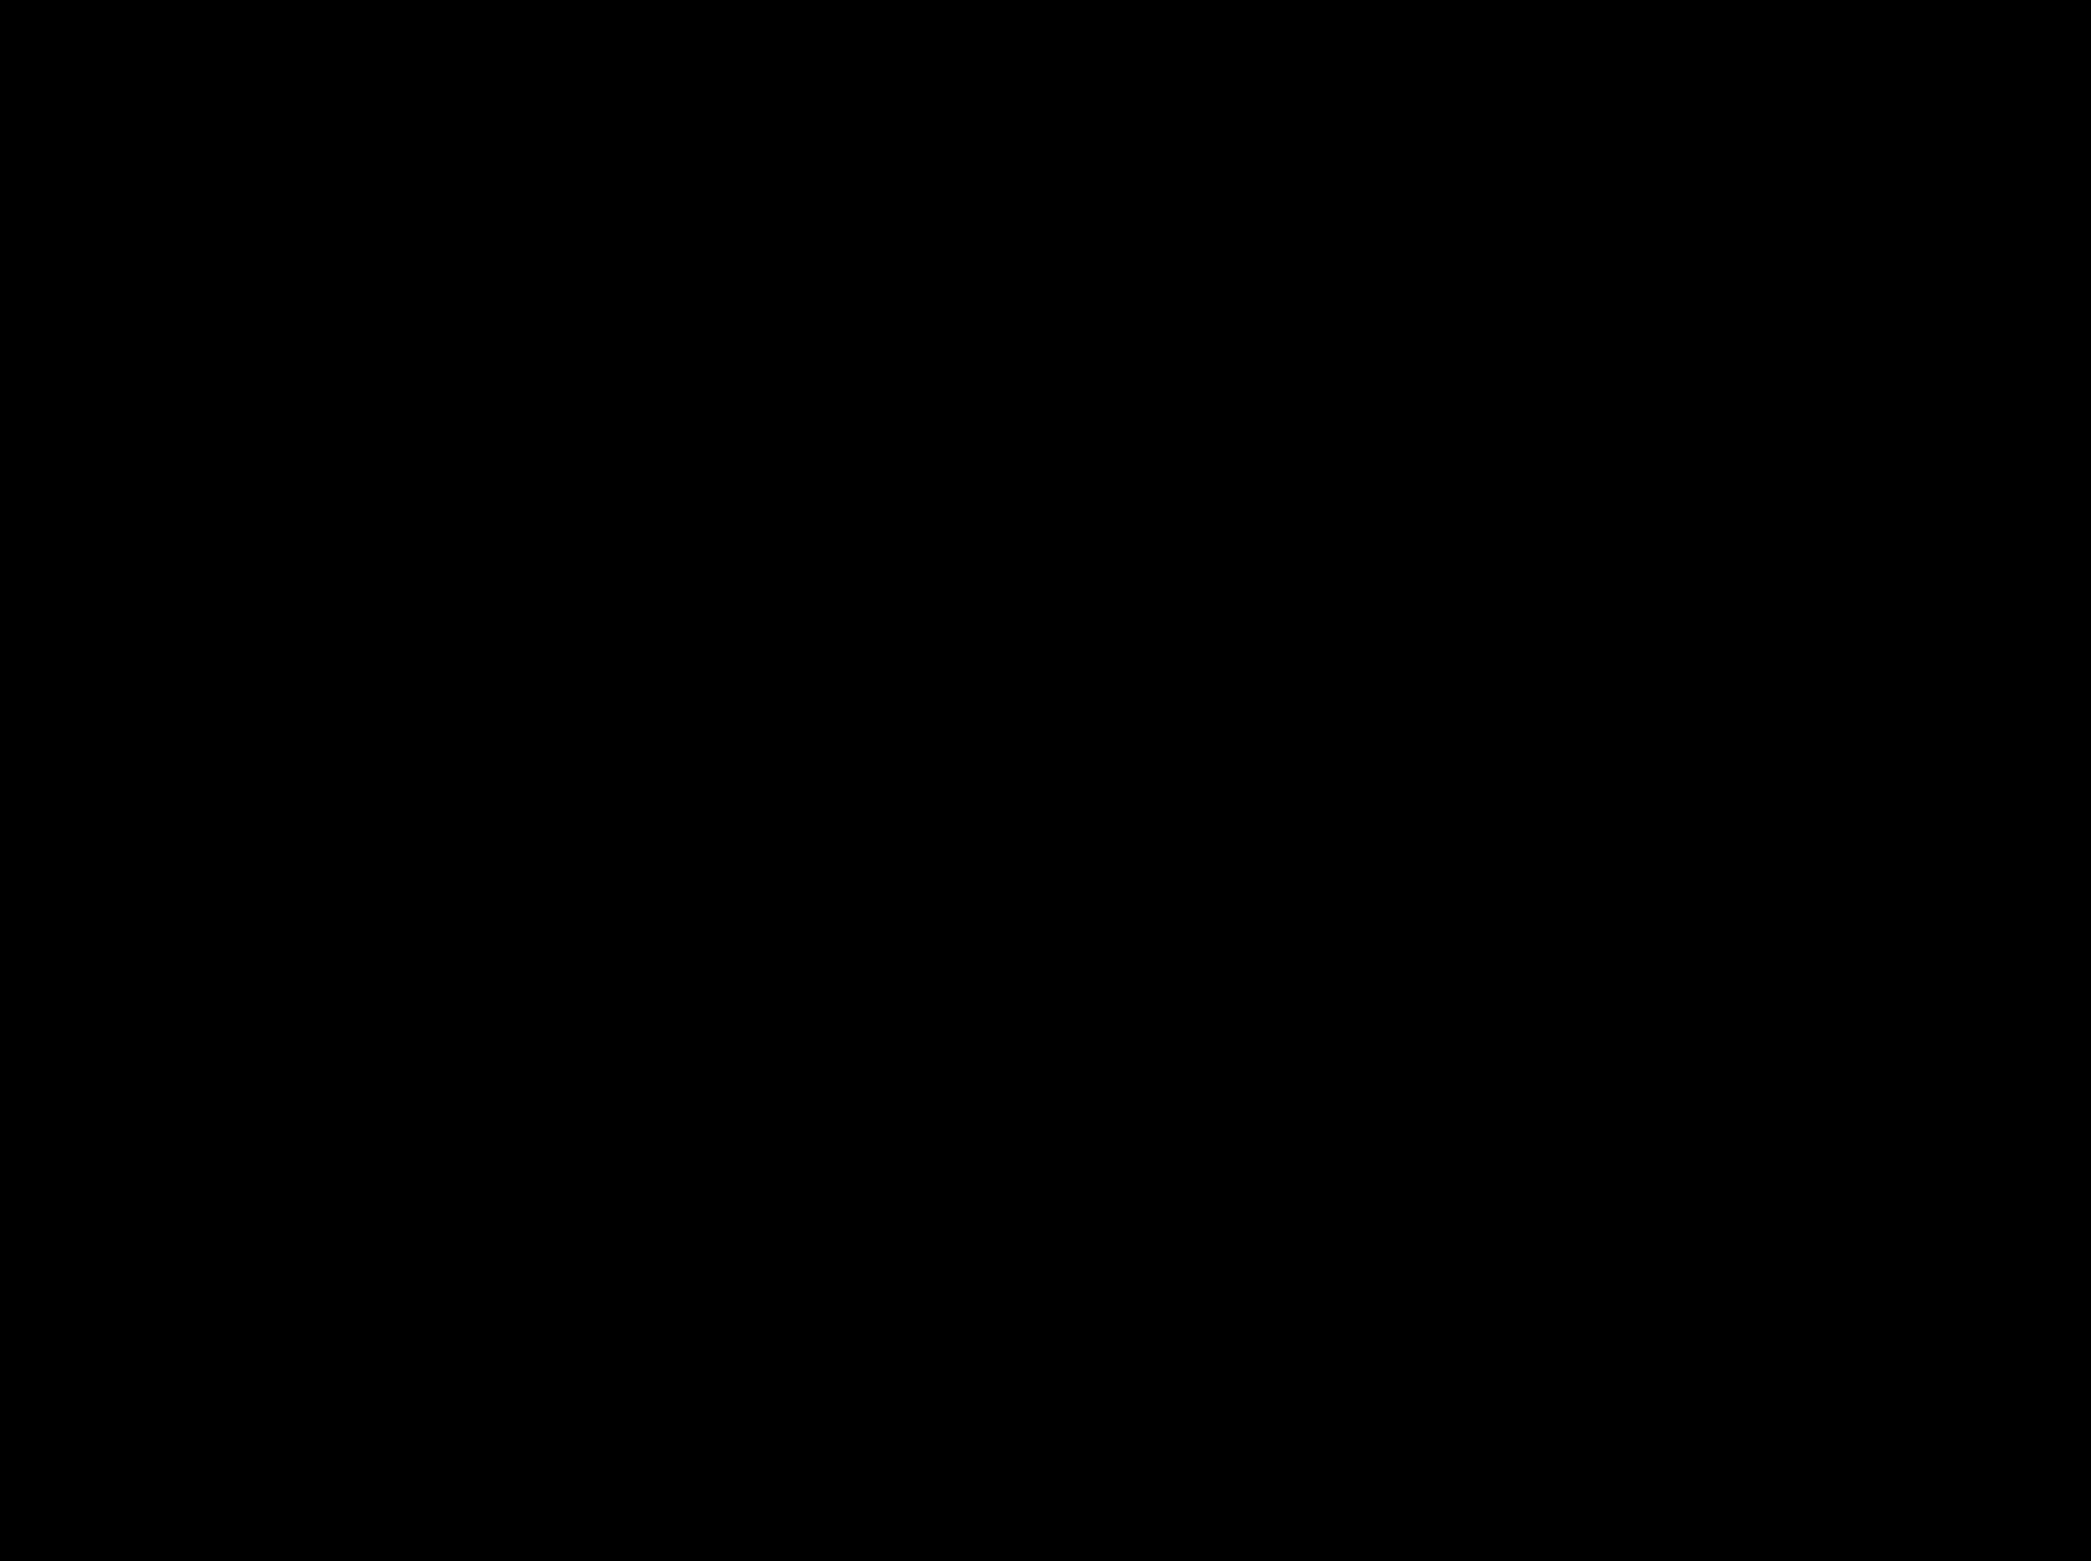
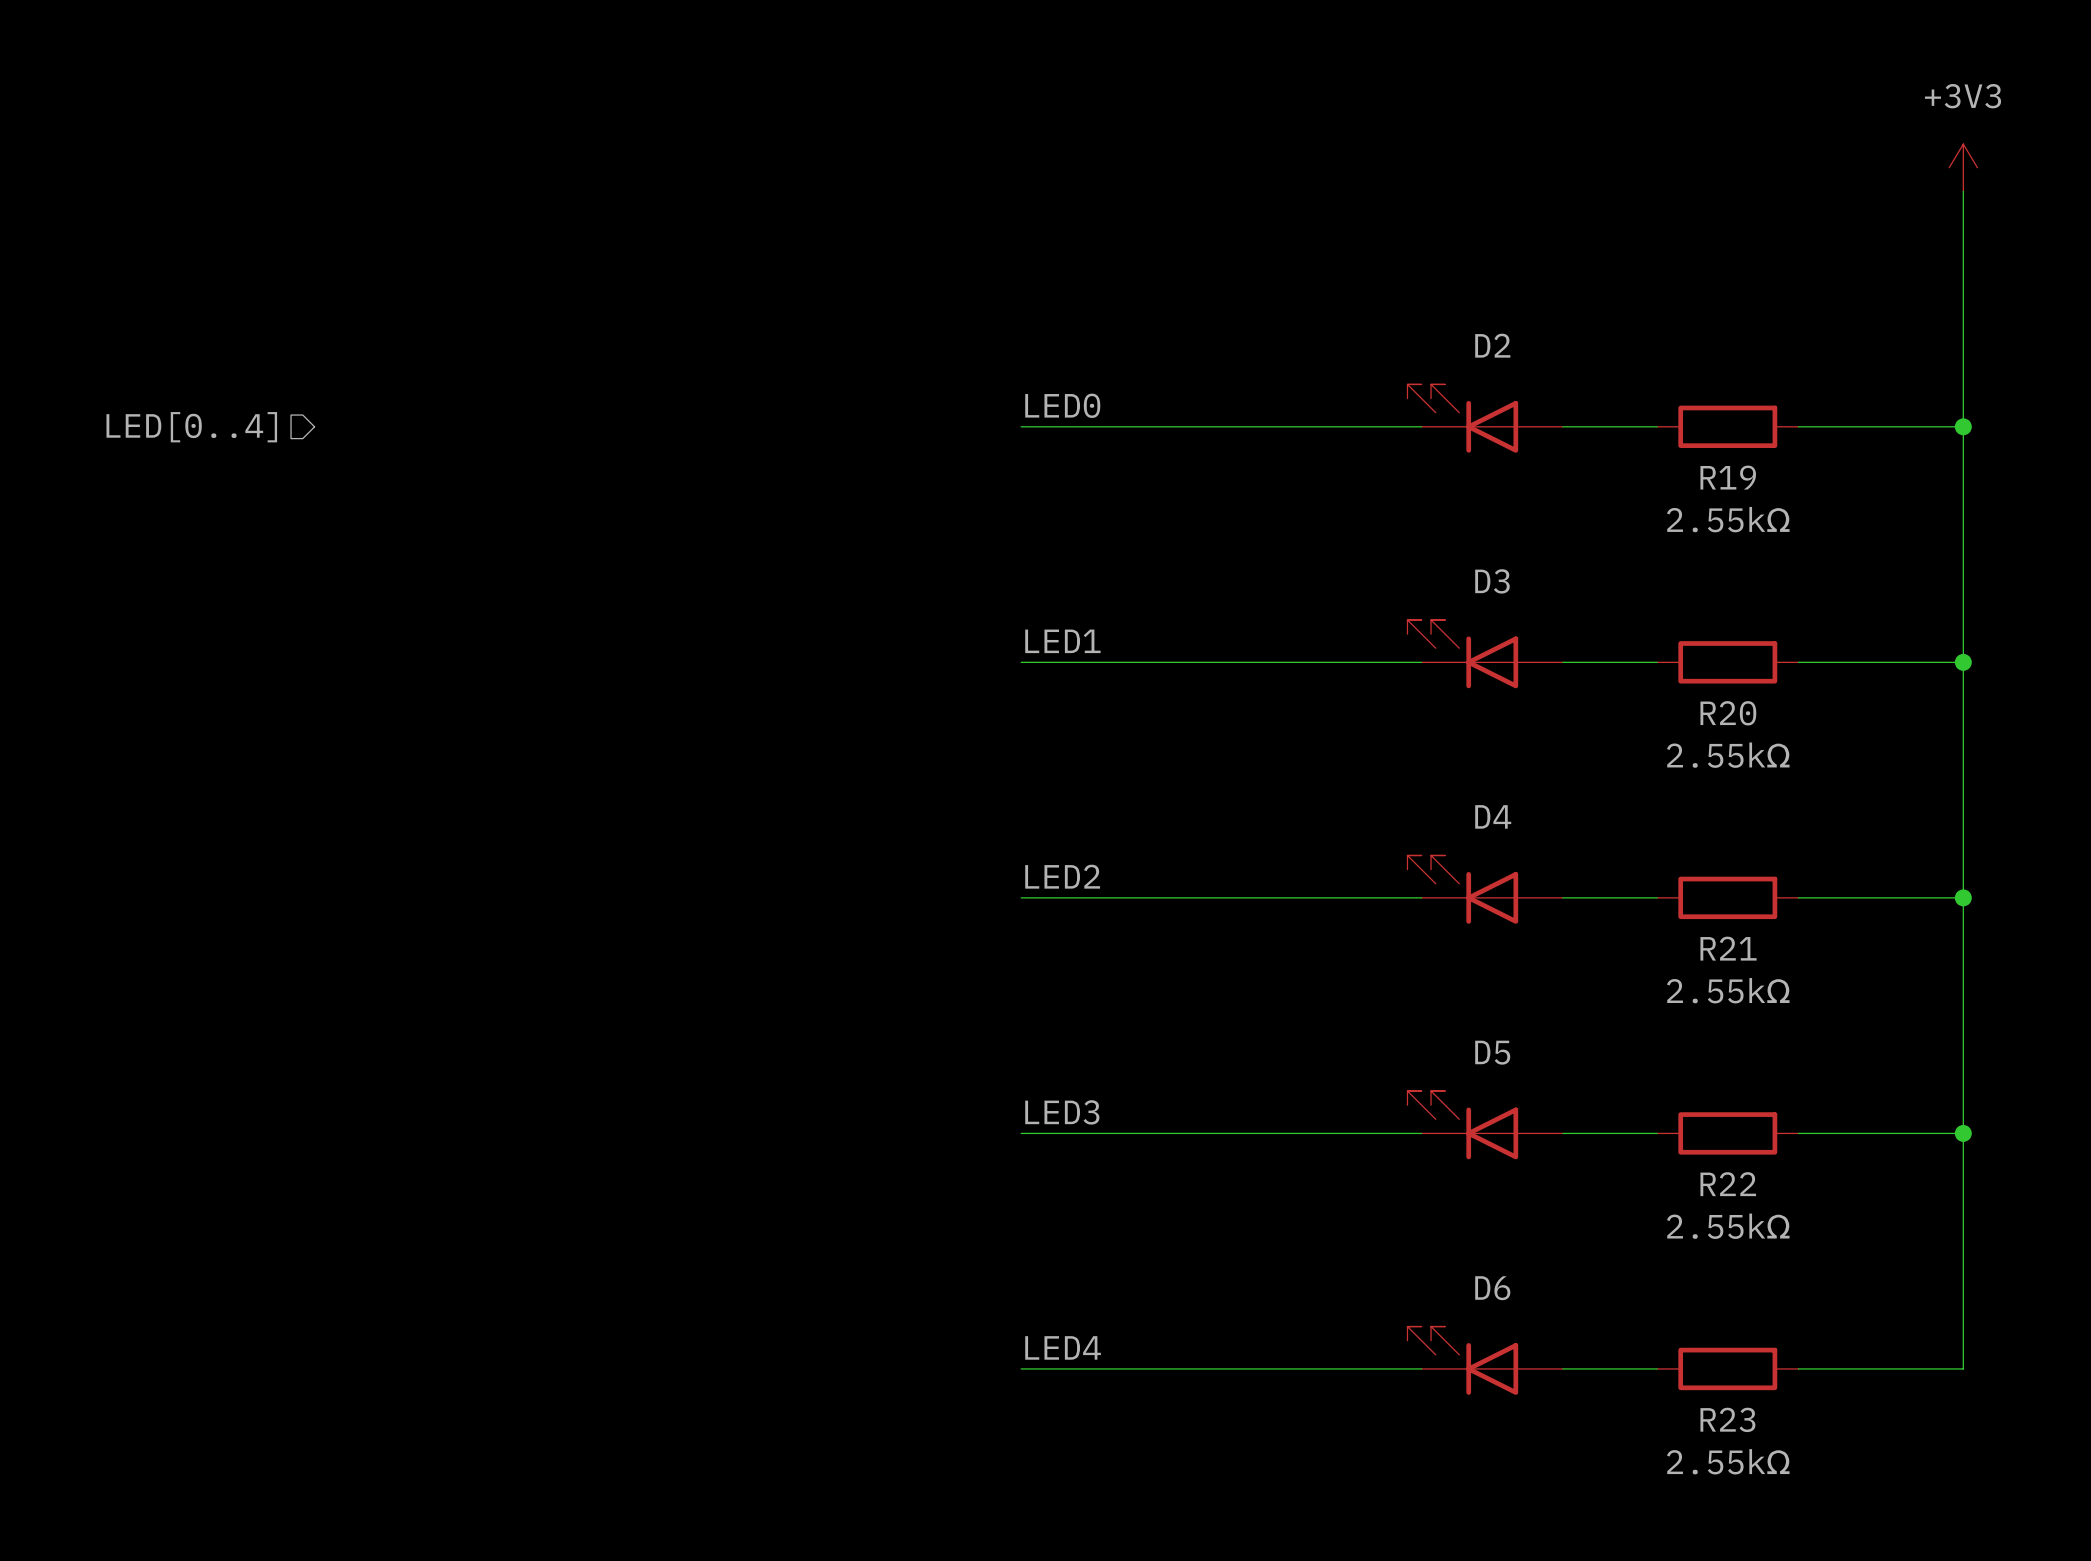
power symbol: none -> +3V3 (1963, 167)
wire: none -> (1963, 191) (1963, 1368) (1798, 1368)
label: none -> LED0 (1062, 405)
D2: none -> (1485, 418)
wire: none -> (1021, 426) (1421, 426)
wire: none -> (1562, 426) (1657, 426)
R19: none -> 2.55kΩ (1727, 426)
wire: none -> (1798, 426) (1963, 426)
junction: none -> (1963, 426)
hierarchical label: none -> LED[0..4] (191, 427)
label: none -> LED1 (1062, 641)
D3: none -> (1485, 654)
wire: none -> (1021, 662) (1421, 662)
wire: none -> (1562, 662) (1657, 662)
R20: none -> 2.55kΩ (1727, 662)
wire: none -> (1798, 662) (1963, 662)
junction: none -> (1963, 662)
label: none -> LED2 (1062, 876)
D4: none -> (1485, 889)
wire: none -> (1021, 897) (1421, 897)
wire: none -> (1562, 897) (1657, 897)
R21: none -> 2.55kΩ (1727, 897)
wire: none -> (1798, 897) (1963, 897)
junction: none -> (1963, 897)
label: none -> LED3 (1062, 1112)
D5: none -> (1485, 1125)
wire: none -> (1021, 1133) (1421, 1133)
wire: none -> (1562, 1133) (1657, 1133)
R22: none -> 2.55kΩ (1727, 1133)
wire: none -> (1798, 1133) (1963, 1133)
junction: none -> (1963, 1133)
label: none -> LED4 (1063, 1347)
D6: none -> (1485, 1360)
wire: none -> (1021, 1368) (1421, 1368)
wire: none -> (1562, 1368) (1657, 1368)
R23: none -> 2.55kΩ (1727, 1368)

